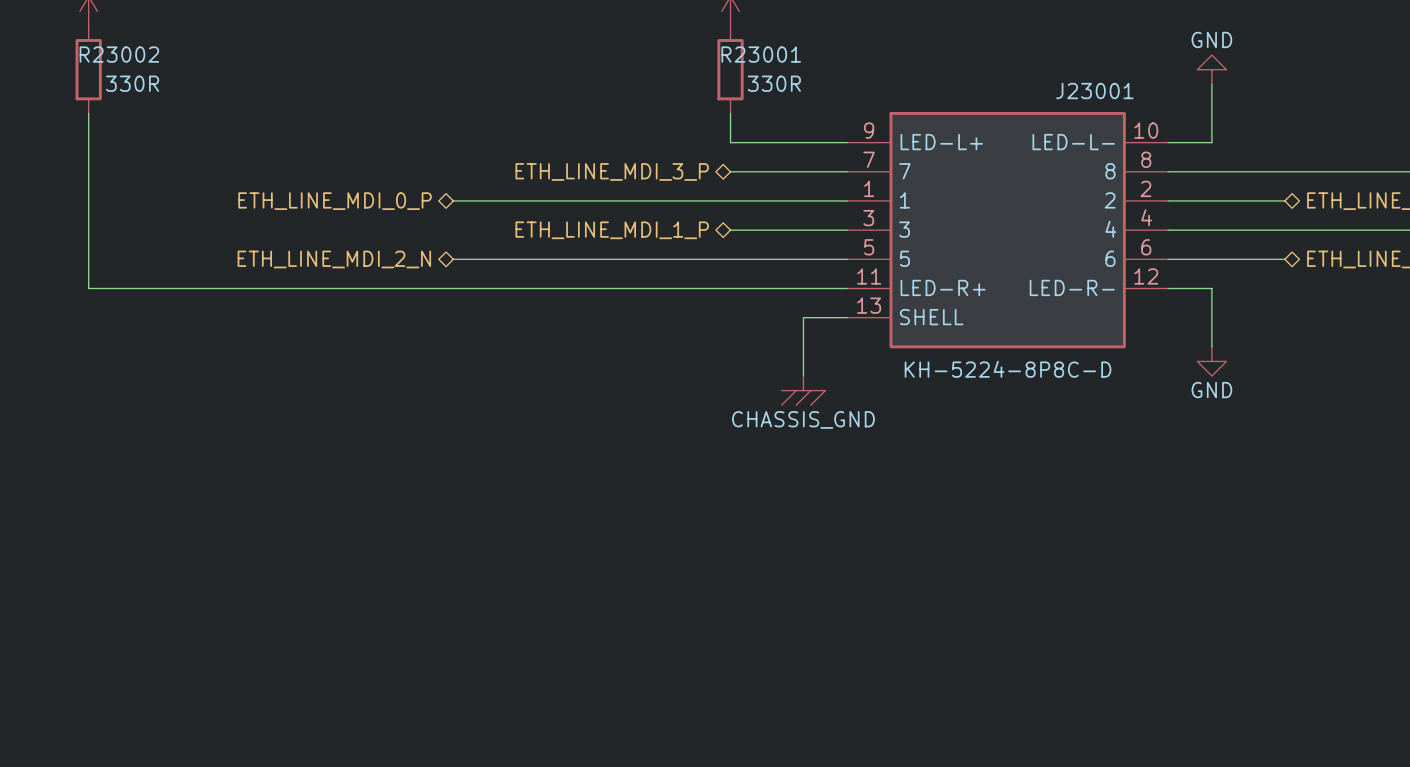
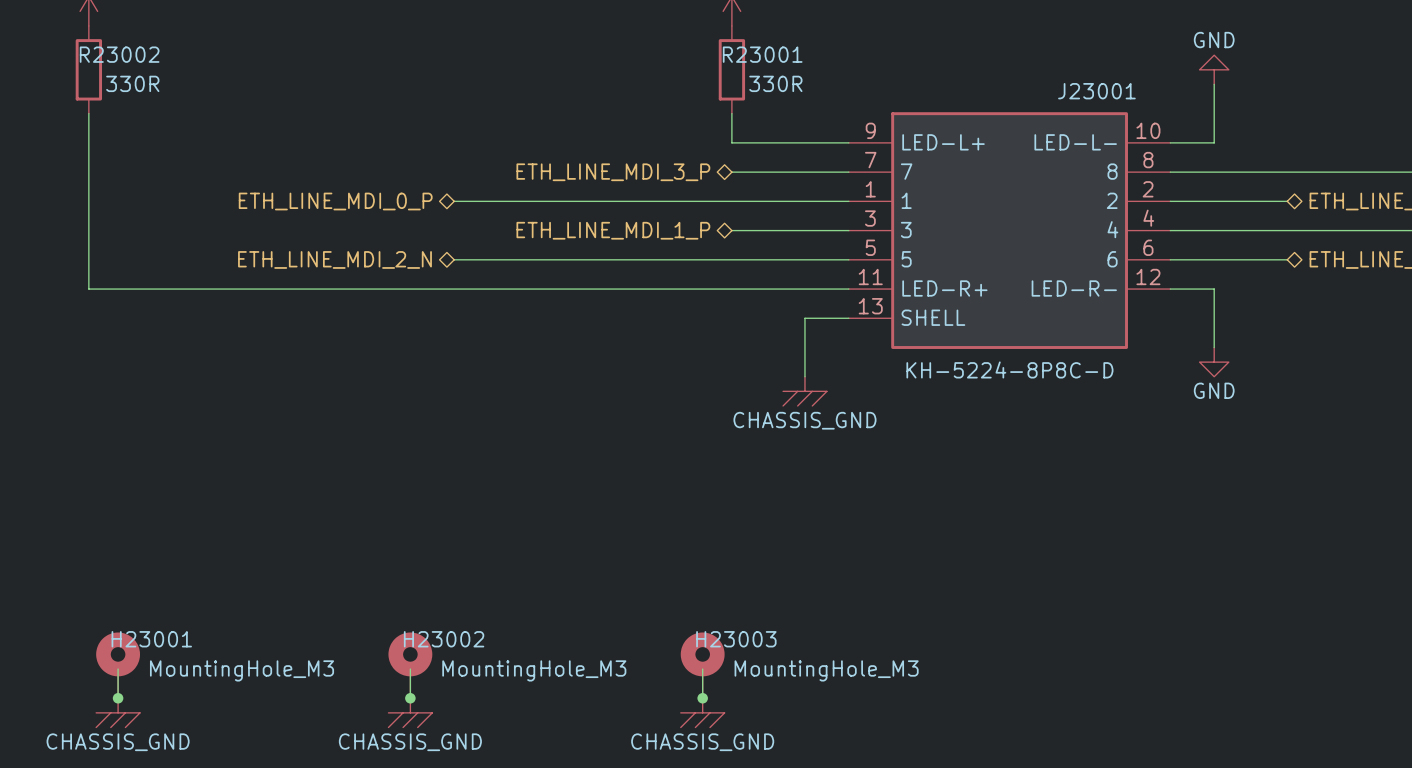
H23001: none -> MountingHole_M3 (118, 665)
H23002: none -> MountingHole_M3 (410, 665)
H23003: none -> MountingHole_M3 (702, 665)
wire: none -> (118, 669) (118, 698)
wire: none -> (410, 669) (410, 698)
wire: none -> (702, 669) (702, 698)
junction: none -> (118, 698)
junction: none -> (410, 698)
junction: none -> (702, 698)
power symbol: none -> CHASSIS_GND (118, 712)
power symbol: none -> CHASSIS_GND (410, 712)
power symbol: none -> CHASSIS_GND (702, 712)

